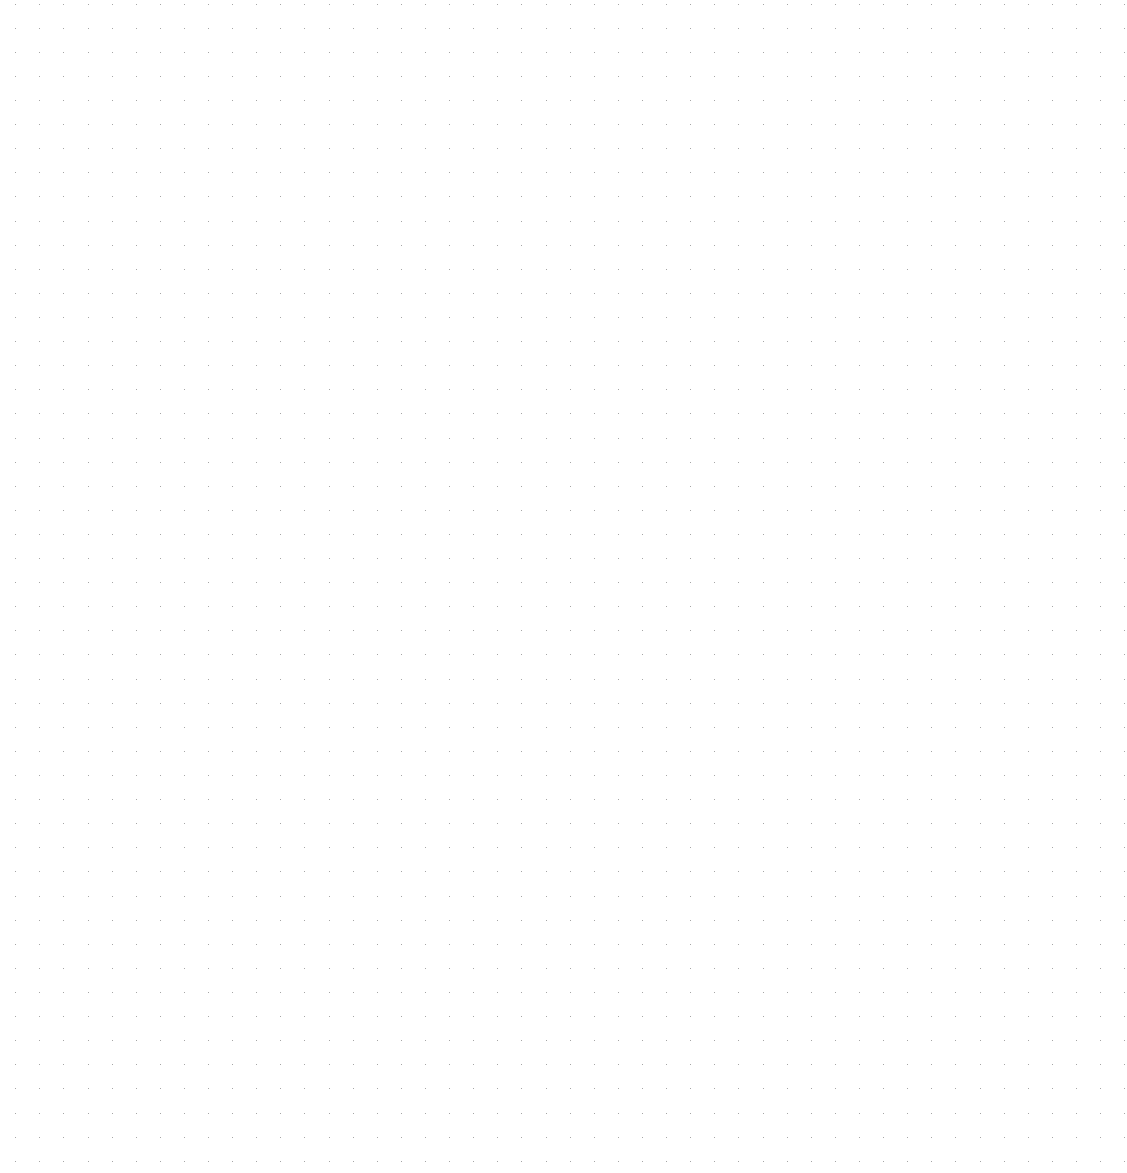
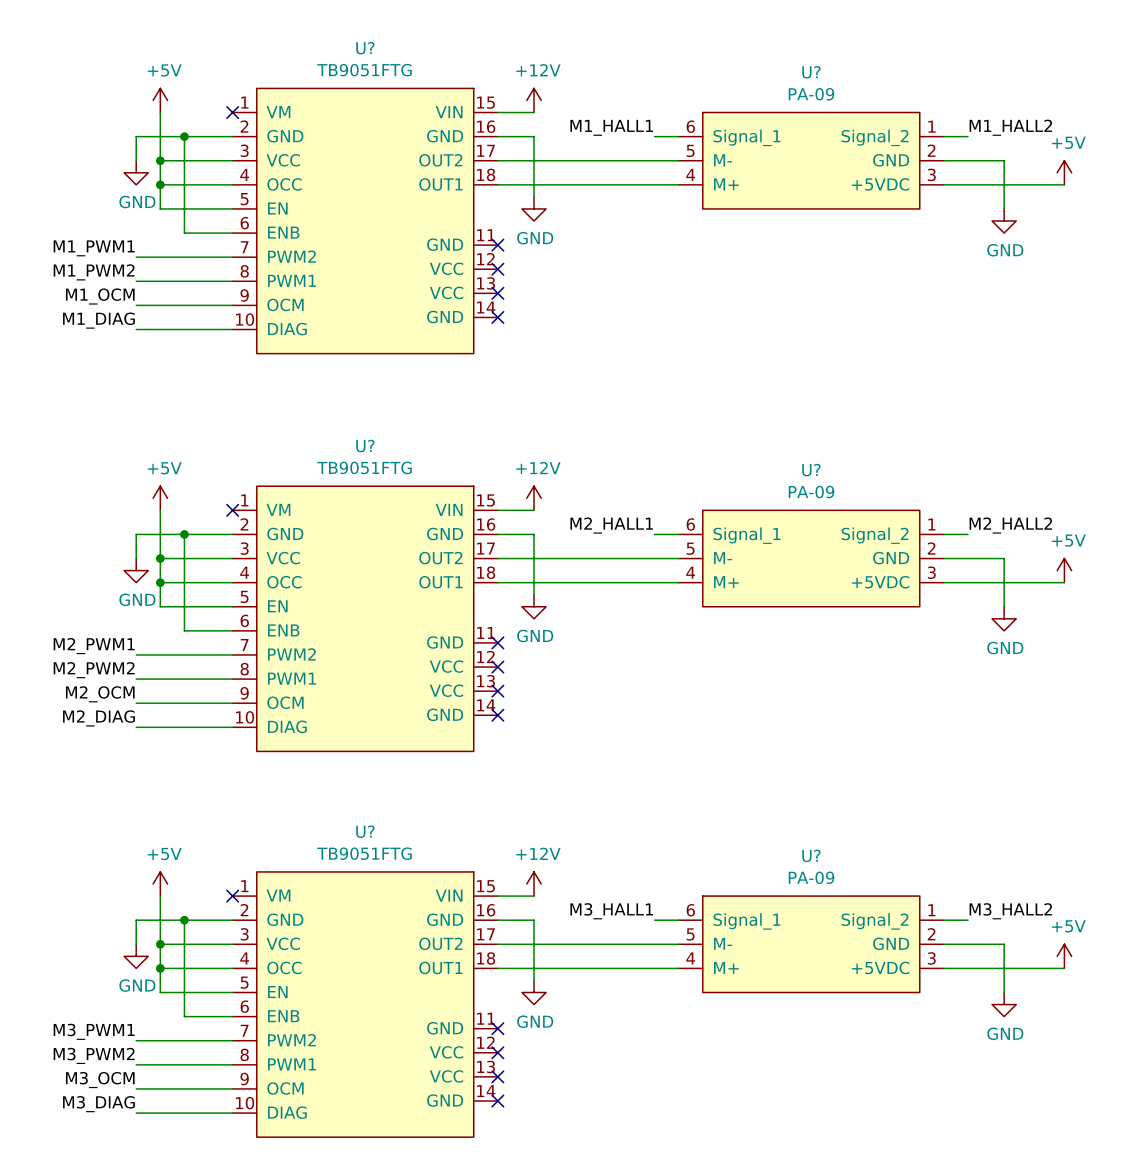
power symbol: none -> +5V (160, 100)
power symbol: none -> +12V (534, 100)
wire: none -> (160, 112) (160, 208) (232, 208)
no-connect mark: none -> (232, 112)
wire: none -> (497, 112) (534, 112)
label: none -> M1_HALL1 (611, 127)
label: none -> M1_HALL2 (1010, 127)
wire: none -> (184, 136) (184, 233) (232, 233)
junction: none -> (184, 136)
wire: none -> (232, 136) (136, 136) (136, 160)
wire: none -> (497, 136) (534, 136) (534, 196)
wire: none -> (654, 136) (678, 136)
wire: none -> (943, 136) (967, 136)
wire: none -> (160, 160) (232, 160)
junction: none -> (160, 160)
wire: none -> (497, 160) (678, 160)
U?: none -> PA-09 (811, 160)
wire: none -> (943, 160) (1004, 160) (1004, 208)
power symbol: none -> GND (136, 172)
power symbol: none -> +5V (1064, 172)
wire: none -> (160, 184) (232, 184)
junction: none -> (160, 184)
wire: none -> (497, 184) (678, 184)
wire: none -> (943, 184) (1064, 184)
power symbol: none -> GND (534, 208)
U?: none -> TB9051FTG (365, 221)
power symbol: none -> GND (1004, 221)
no-connect mark: none -> (497, 245)
label: none -> M1_PWM1 (94, 248)
wire: none -> (136, 257) (232, 257)
no-connect mark: none -> (497, 269)
label: none -> M1_PWM2 (94, 272)
wire: none -> (136, 281) (232, 281)
no-connect mark: none -> (497, 293)
label: none -> M1_OCM (100, 296)
wire: none -> (136, 305) (232, 305)
no-connect mark: none -> (497, 317)
label: none -> M1_DIAG (98, 320)
wire: none -> (136, 329) (232, 329)
power symbol: none -> +5V (160, 498)
power symbol: none -> +12V (534, 498)
wire: none -> (160, 510) (160, 606) (232, 606)
no-connect mark: none -> (232, 510)
wire: none -> (497, 510) (534, 510)
label: none -> M2_HALL1 (611, 525)
label: none -> M2_HALL2 (1010, 525)
wire: none -> (184, 534) (184, 630) (232, 630)
junction: none -> (184, 534)
wire: none -> (232, 534) (136, 534) (136, 558)
wire: none -> (497, 534) (534, 534) (534, 594)
wire: none -> (654, 534) (678, 534)
wire: none -> (943, 534) (967, 534)
wire: none -> (160, 558) (232, 558)
junction: none -> (160, 558)
wire: none -> (497, 558) (678, 558)
U?: none -> PA-09 (811, 558)
wire: none -> (943, 558) (1004, 558) (1004, 606)
power symbol: none -> GND (136, 570)
power symbol: none -> +5V (1064, 570)
wire: none -> (160, 582) (232, 582)
junction: none -> (160, 582)
wire: none -> (497, 582) (678, 582)
wire: none -> (943, 582) (1064, 582)
power symbol: none -> GND (534, 606)
U?: none -> TB9051FTG (365, 618)
power symbol: none -> GND (1004, 618)
no-connect mark: none -> (497, 642)
label: none -> M2_PWM1 (94, 646)
wire: none -> (136, 654) (232, 654)
no-connect mark: none -> (497, 667)
label: none -> M2_PWM2 (94, 670)
wire: none -> (136, 679) (232, 679)
no-connect mark: none -> (497, 691)
label: none -> M2_OCM (100, 694)
wire: none -> (136, 703) (232, 703)
no-connect mark: none -> (497, 715)
label: none -> M2_DIAG (98, 718)
wire: none -> (136, 727) (232, 727)
power symbol: none -> +5V (160, 884)
power symbol: none -> +12V (534, 884)
wire: none -> (160, 896) (160, 992) (232, 992)
no-connect mark: none -> (232, 896)
wire: none -> (497, 896) (534, 896)
label: none -> M3_HALL1 (611, 911)
label: none -> M3_HALL2 (1010, 911)
wire: none -> (184, 920) (184, 1016) (232, 1016)
junction: none -> (184, 920)
wire: none -> (232, 920) (136, 920) (136, 944)
wire: none -> (497, 920) (534, 920) (534, 980)
wire: none -> (654, 920) (678, 920)
wire: none -> (943, 920) (967, 920)
wire: none -> (160, 944) (232, 944)
junction: none -> (160, 944)
wire: none -> (497, 944) (678, 944)
U?: none -> PA-09 (811, 944)
wire: none -> (943, 944) (1004, 944) (1004, 992)
power symbol: none -> GND (136, 956)
power symbol: none -> +5V (1064, 956)
wire: none -> (160, 968) (232, 968)
junction: none -> (160, 968)
wire: none -> (497, 968) (678, 968)
wire: none -> (943, 968) (1064, 968)
power symbol: none -> GND (534, 992)
U?: none -> TB9051FTG (365, 1004)
power symbol: none -> GND (1004, 1004)
no-connect mark: none -> (497, 1028)
label: none -> M3_PWM1 (94, 1031)
wire: none -> (136, 1040) (232, 1040)
no-connect mark: none -> (497, 1052)
label: none -> M3_PWM2 (94, 1055)
wire: none -> (136, 1064) (232, 1064)
no-connect mark: none -> (497, 1076)
label: none -> M3_OCM (100, 1080)
wire: none -> (136, 1088) (232, 1088)
no-connect mark: none -> (497, 1101)
label: none -> M3_DIAG (98, 1104)
wire: none -> (136, 1113) (232, 1113)

